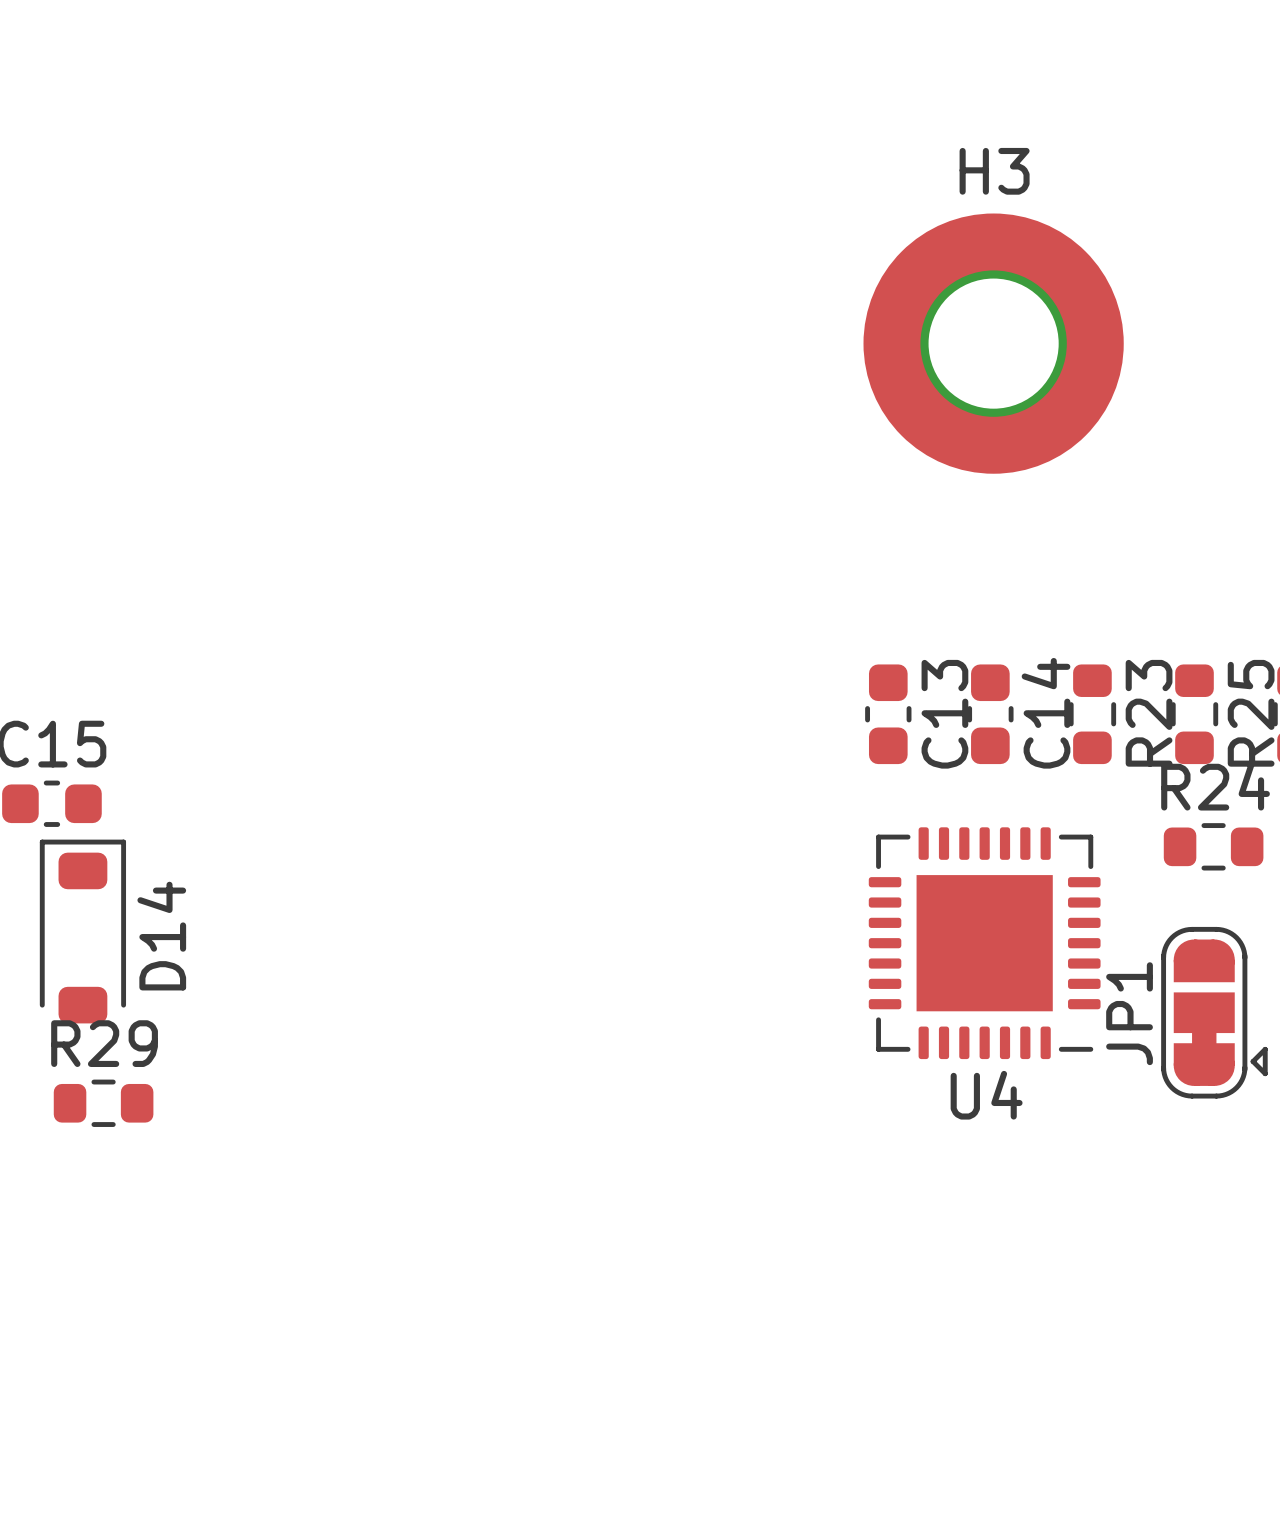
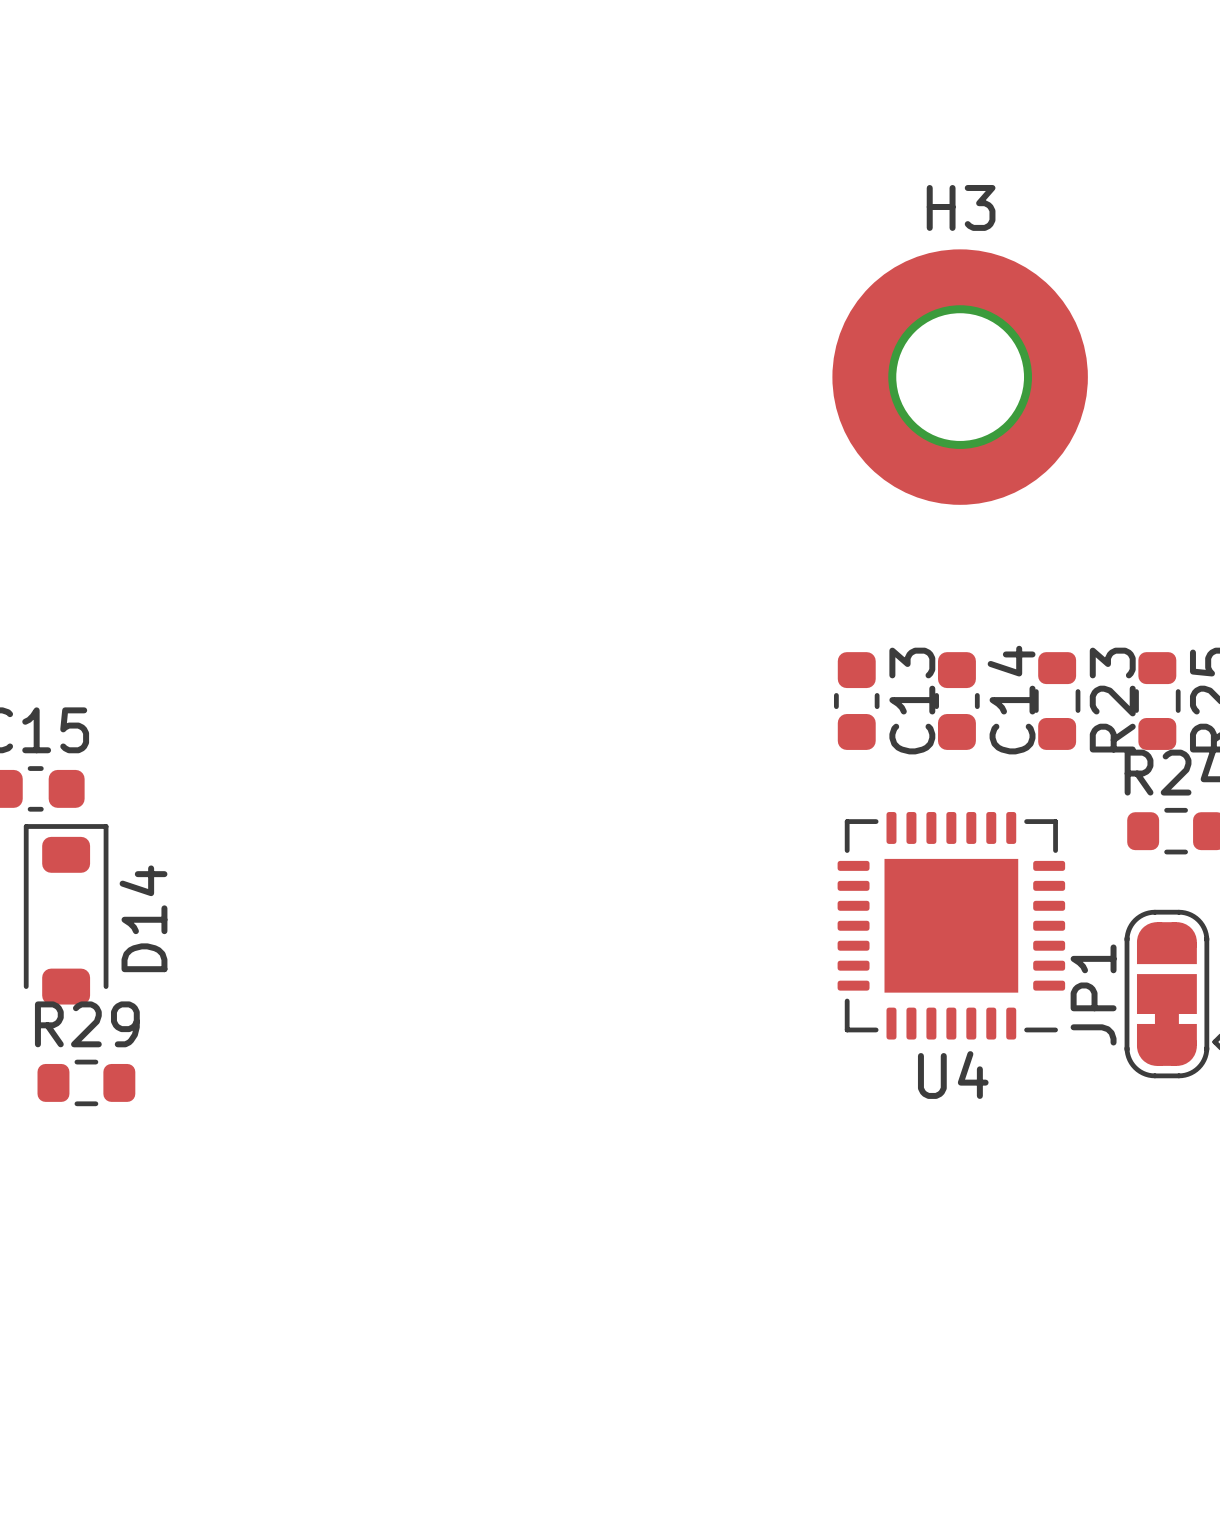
H3 position: (993, 343) -> (960, 377)

